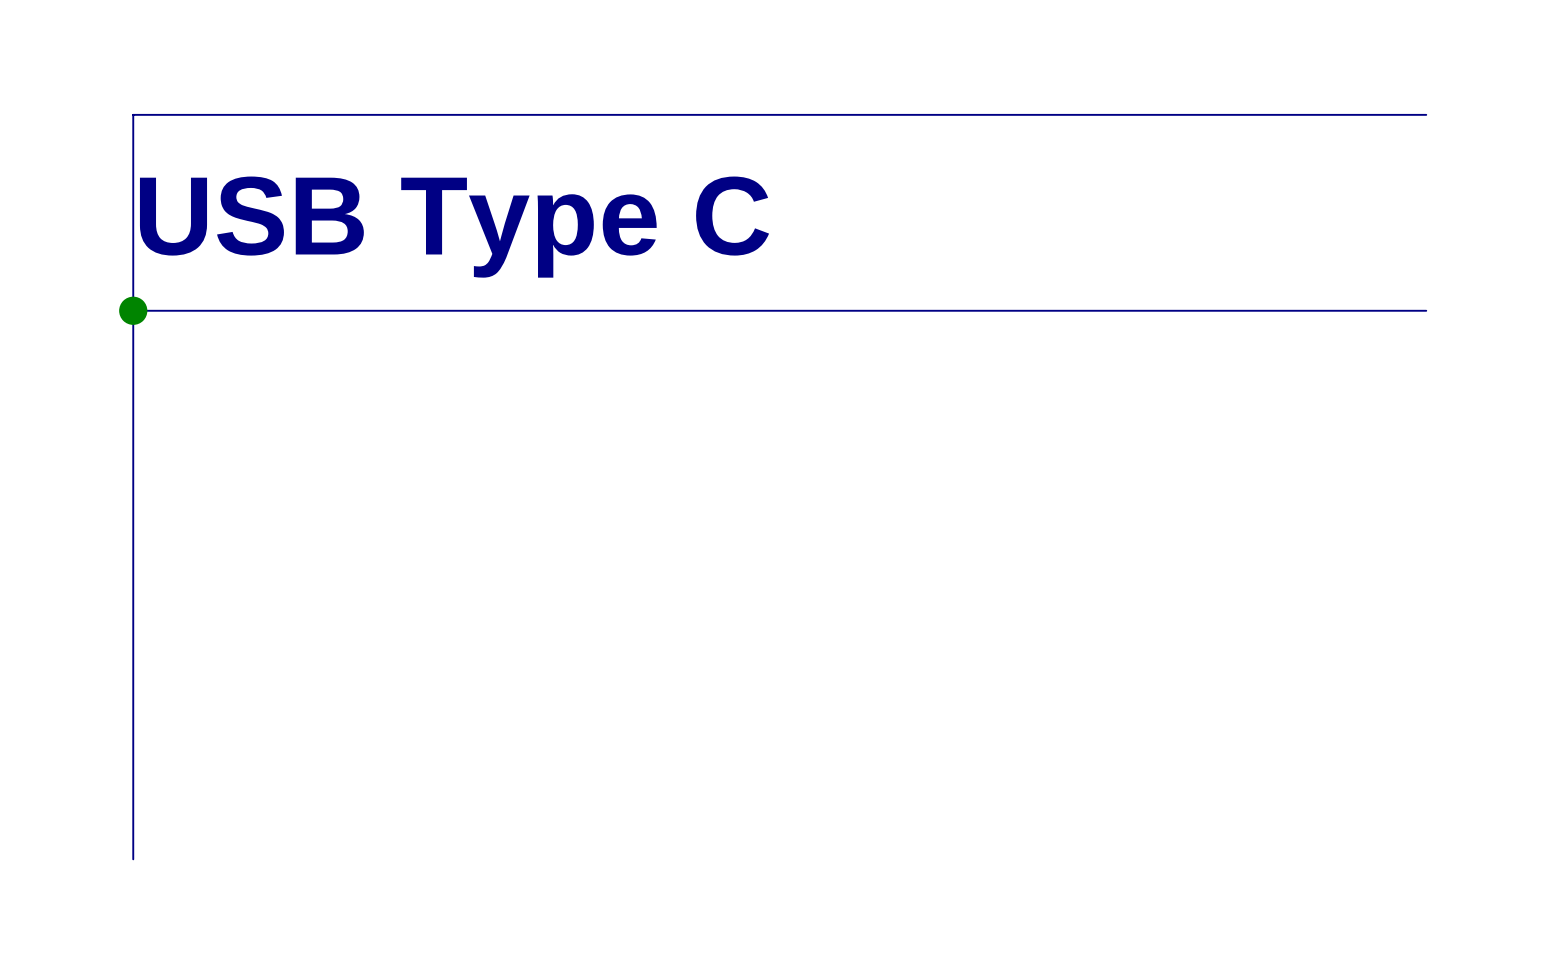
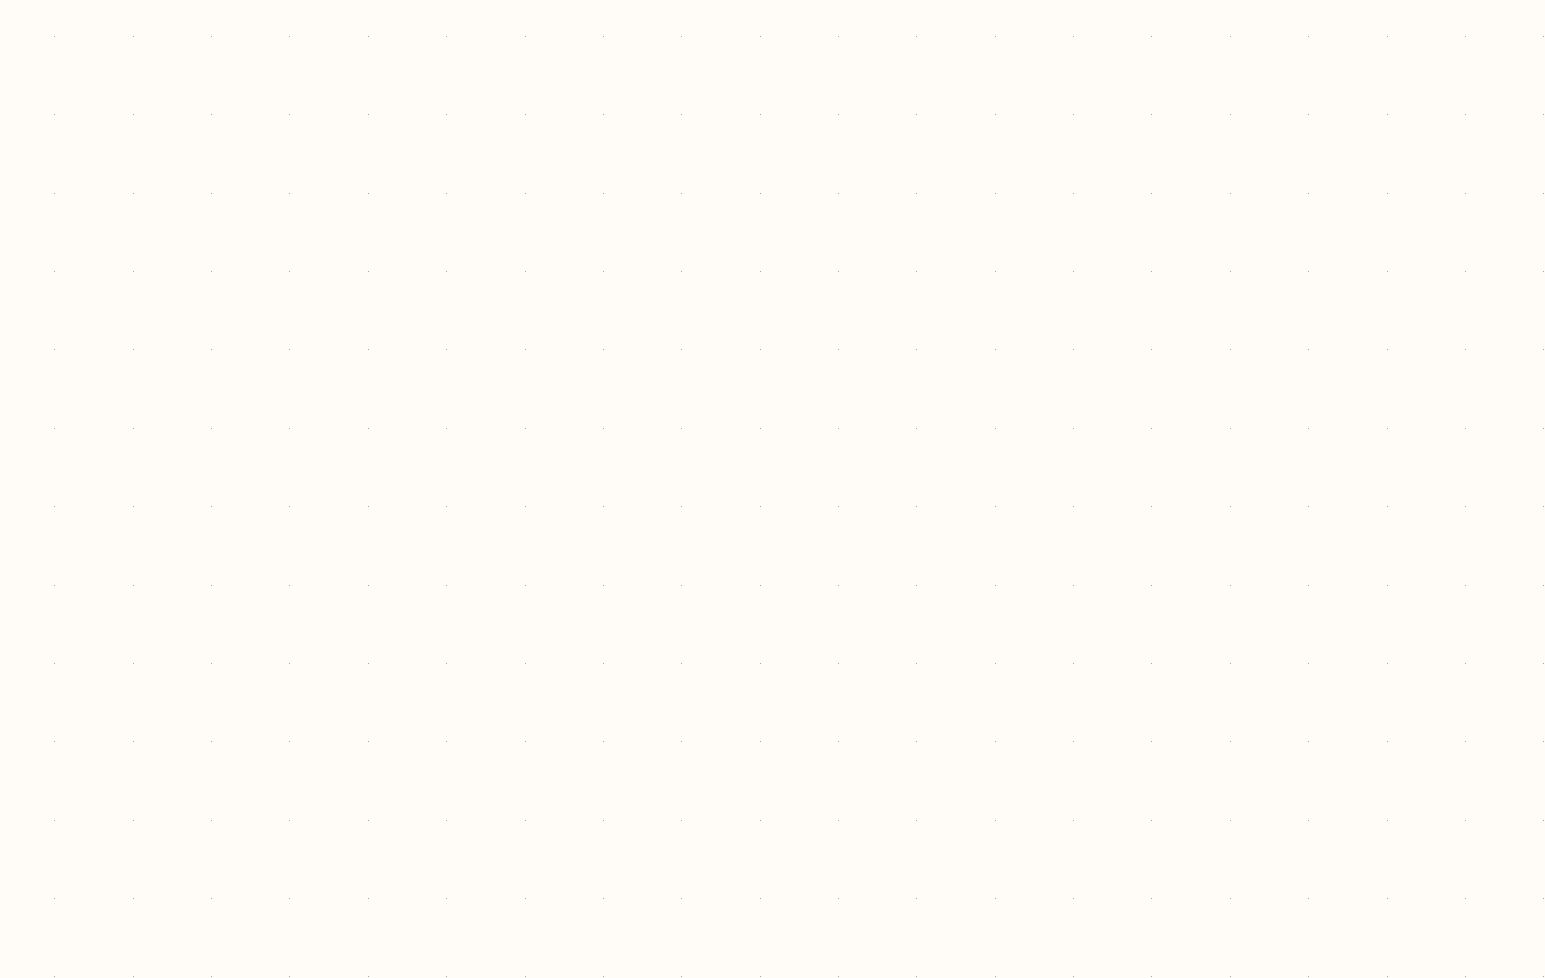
bus: (1426, 114) (133, 114) (133, 859) -> none
text: USB Type C (454, 227) -> none
bus: (133, 310) (1426, 310) -> none
junction: (133, 310) -> none

